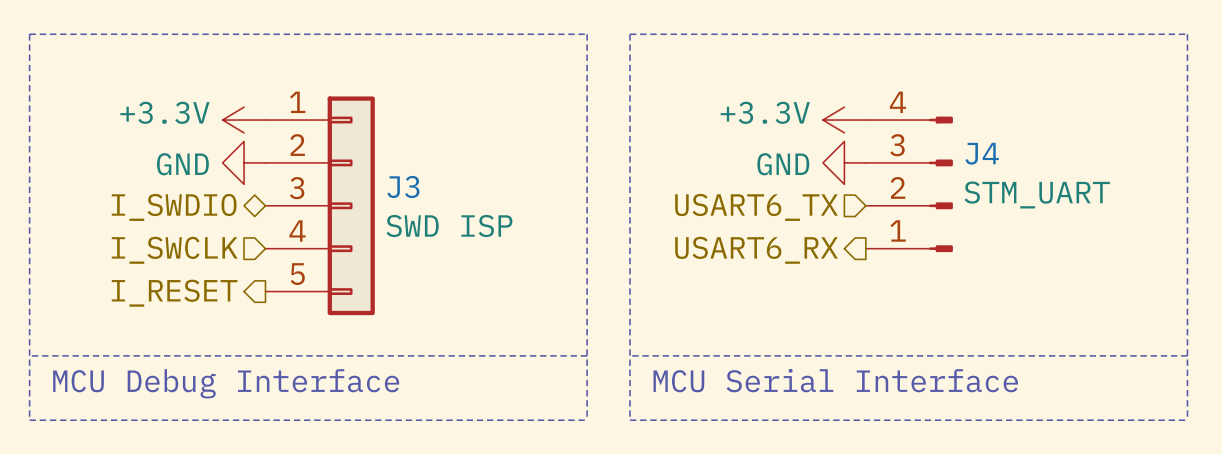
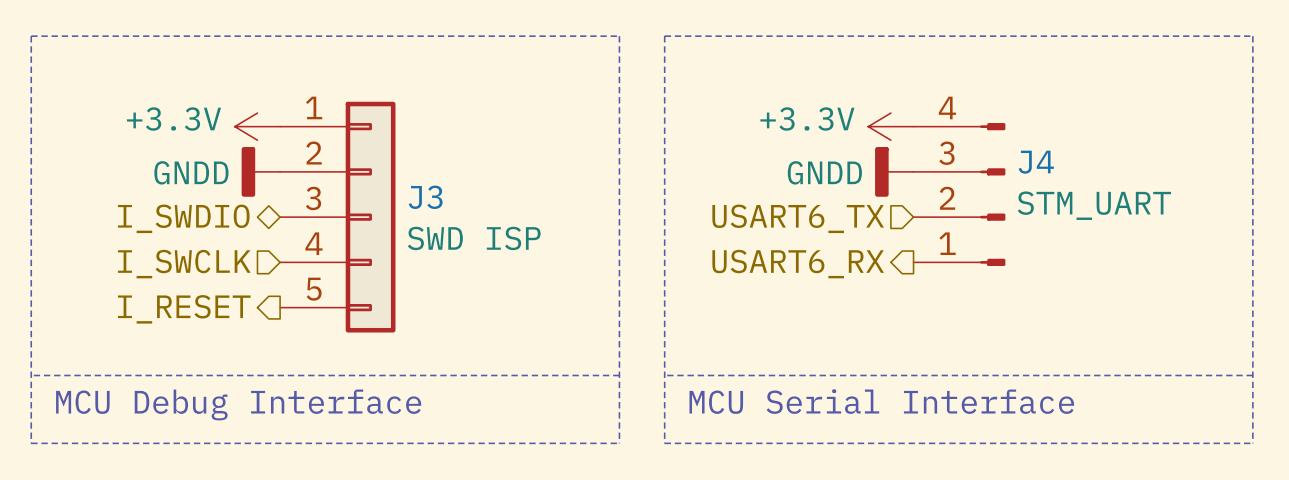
power symbol: GND (244, 162) -> GNDD (260, 171)
power symbol: GND (844, 162) -> GNDD (894, 171)

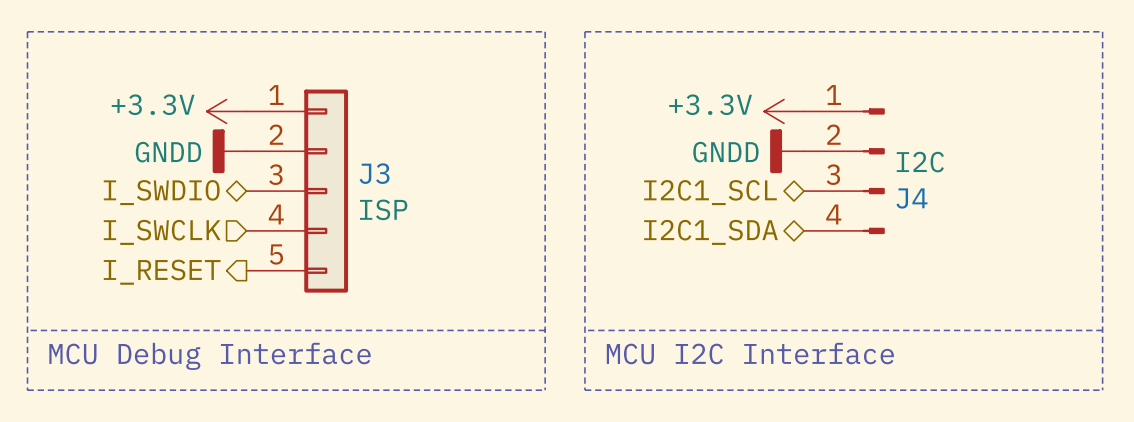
J4 flip: as is (992, 194) -> up-down (873, 171)
J4 value: STM_UART (1094, 205) -> I2C (920, 162)
hierarchical label shape: input (798, 218) -> bidirectional (710, 192)
hierarchical label: USART6_TX (798, 218) -> I2C1_SCL (710, 192)
J3 value: SWD ISP (474, 238) -> ISP (383, 209)
hierarchical label shape: output (798, 264) -> bidirectional (710, 232)
hierarchical label: USART6_RX (798, 264) -> I2C1_SDA (710, 232)
text: MCU Serial Interface (881, 401) -> MCU I2C Interface (750, 353)

